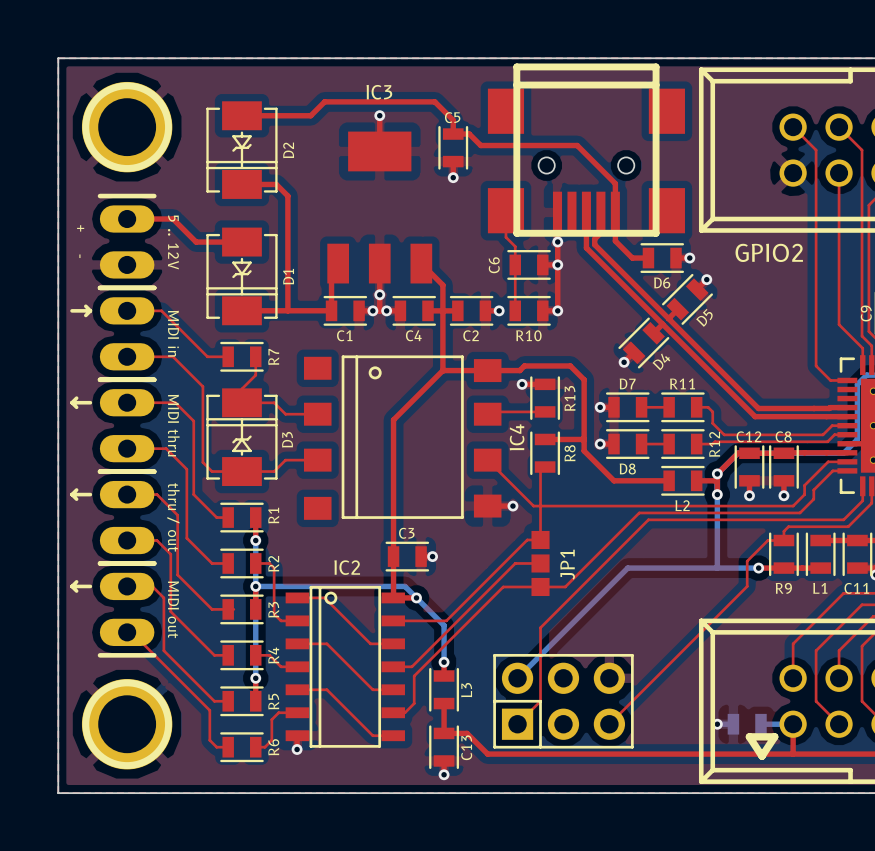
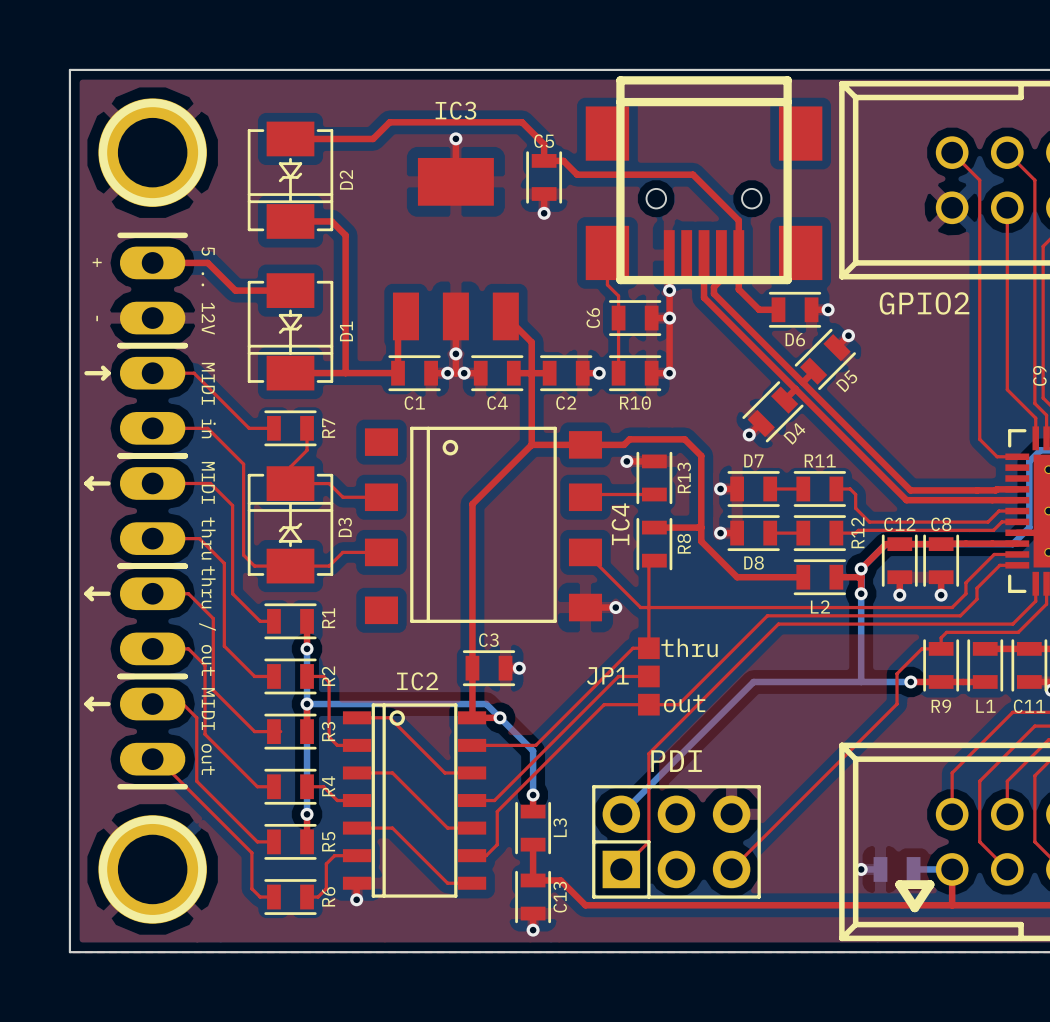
text: none -> thru (689, 647)
JP1 name rotation: 0° (567, 564) -> 90° clockwise (607, 675)
JP1 name position: JP1 (567, 564) -> JP1 (607, 675)
text: none -> out (684, 703)
part value: none -> PDI (676, 761)

